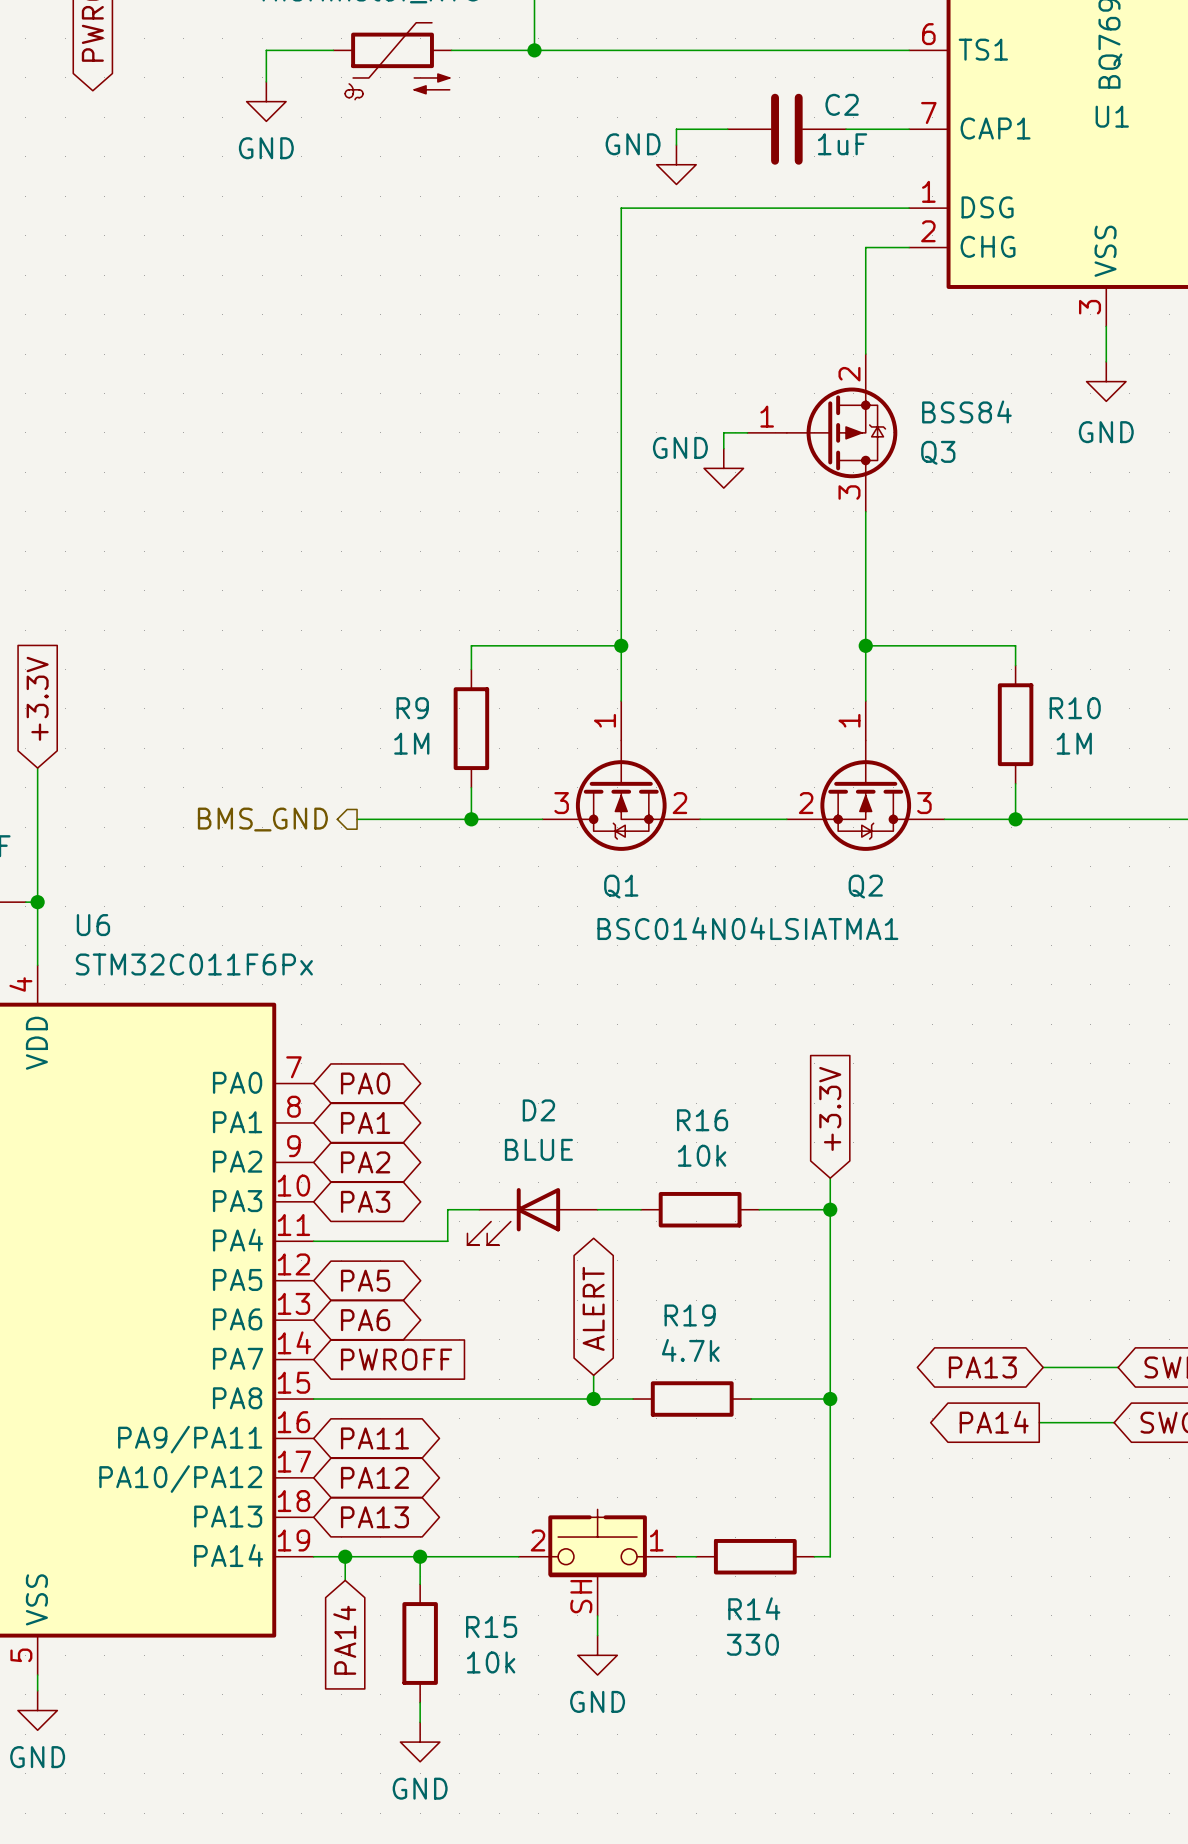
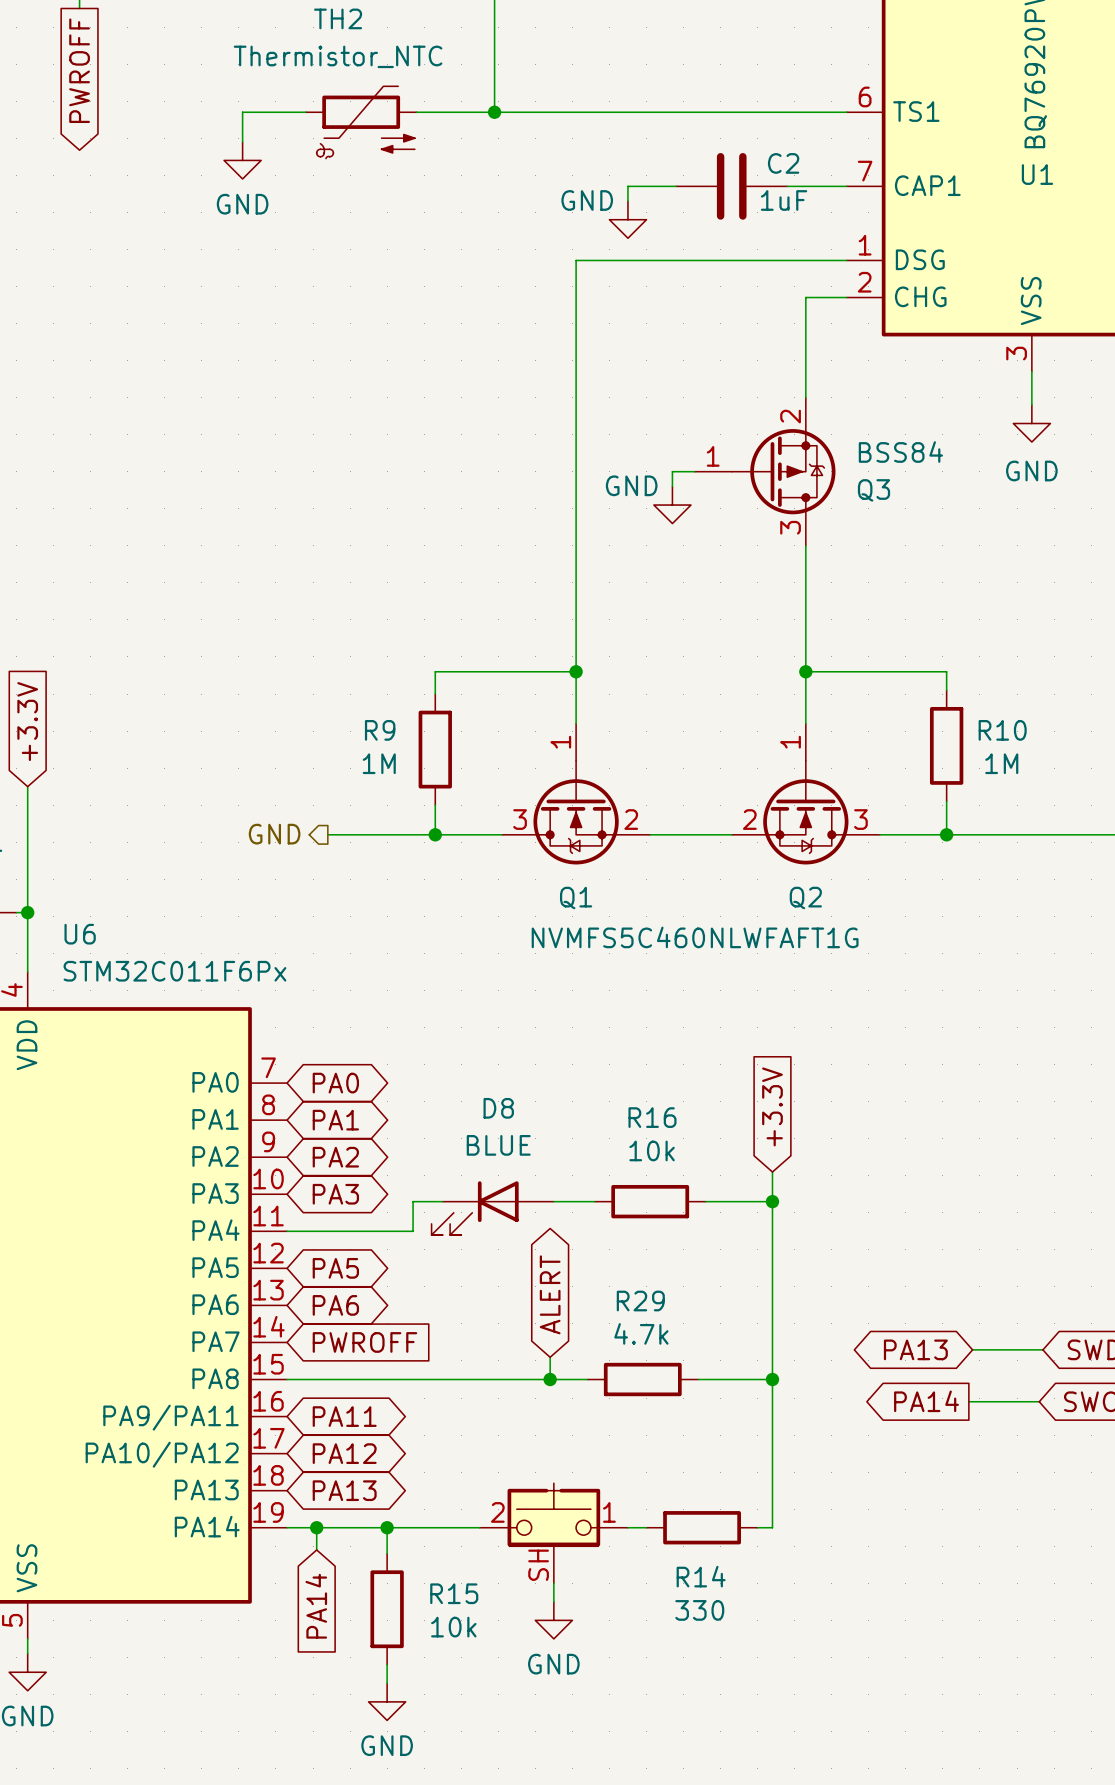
hierarchical label: BMS_GND (262, 819) -> GND (274, 834)
Q1 value: BSC014N04LSIATMA1 (747, 928) -> NVMFS5C460NLWFAFT1G (695, 937)
D2 name: D2 (538, 1110) -> D8 (498, 1108)
R19 name: R19 (690, 1315) -> R29 (640, 1301)

